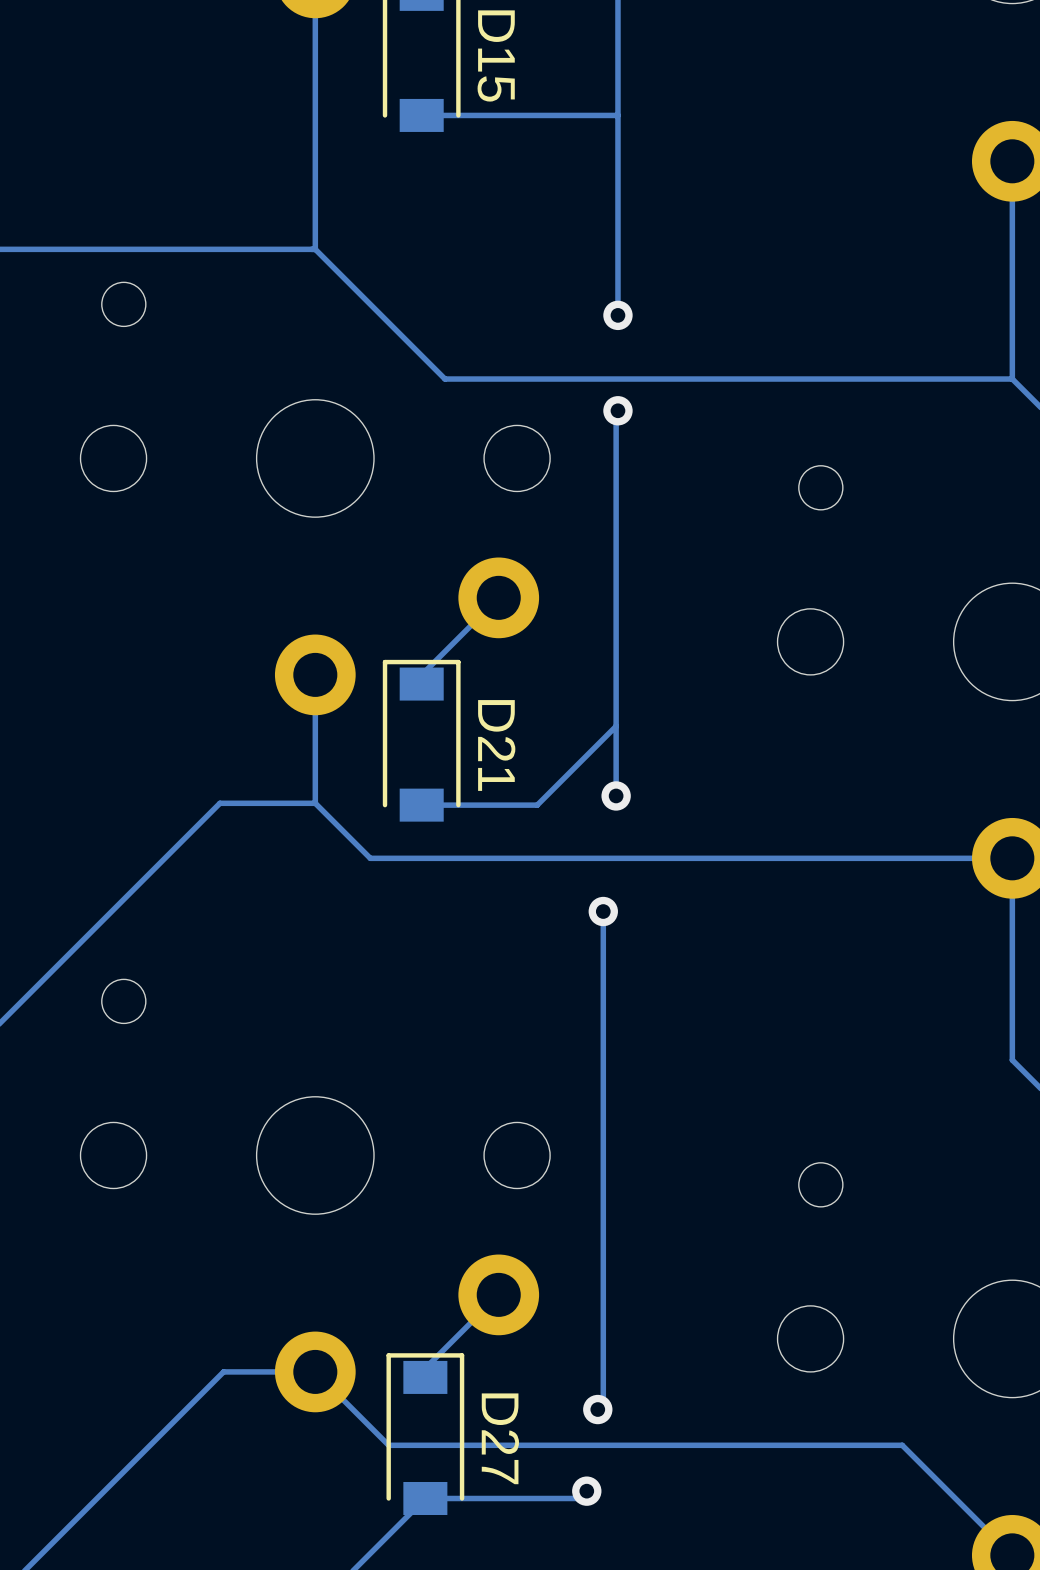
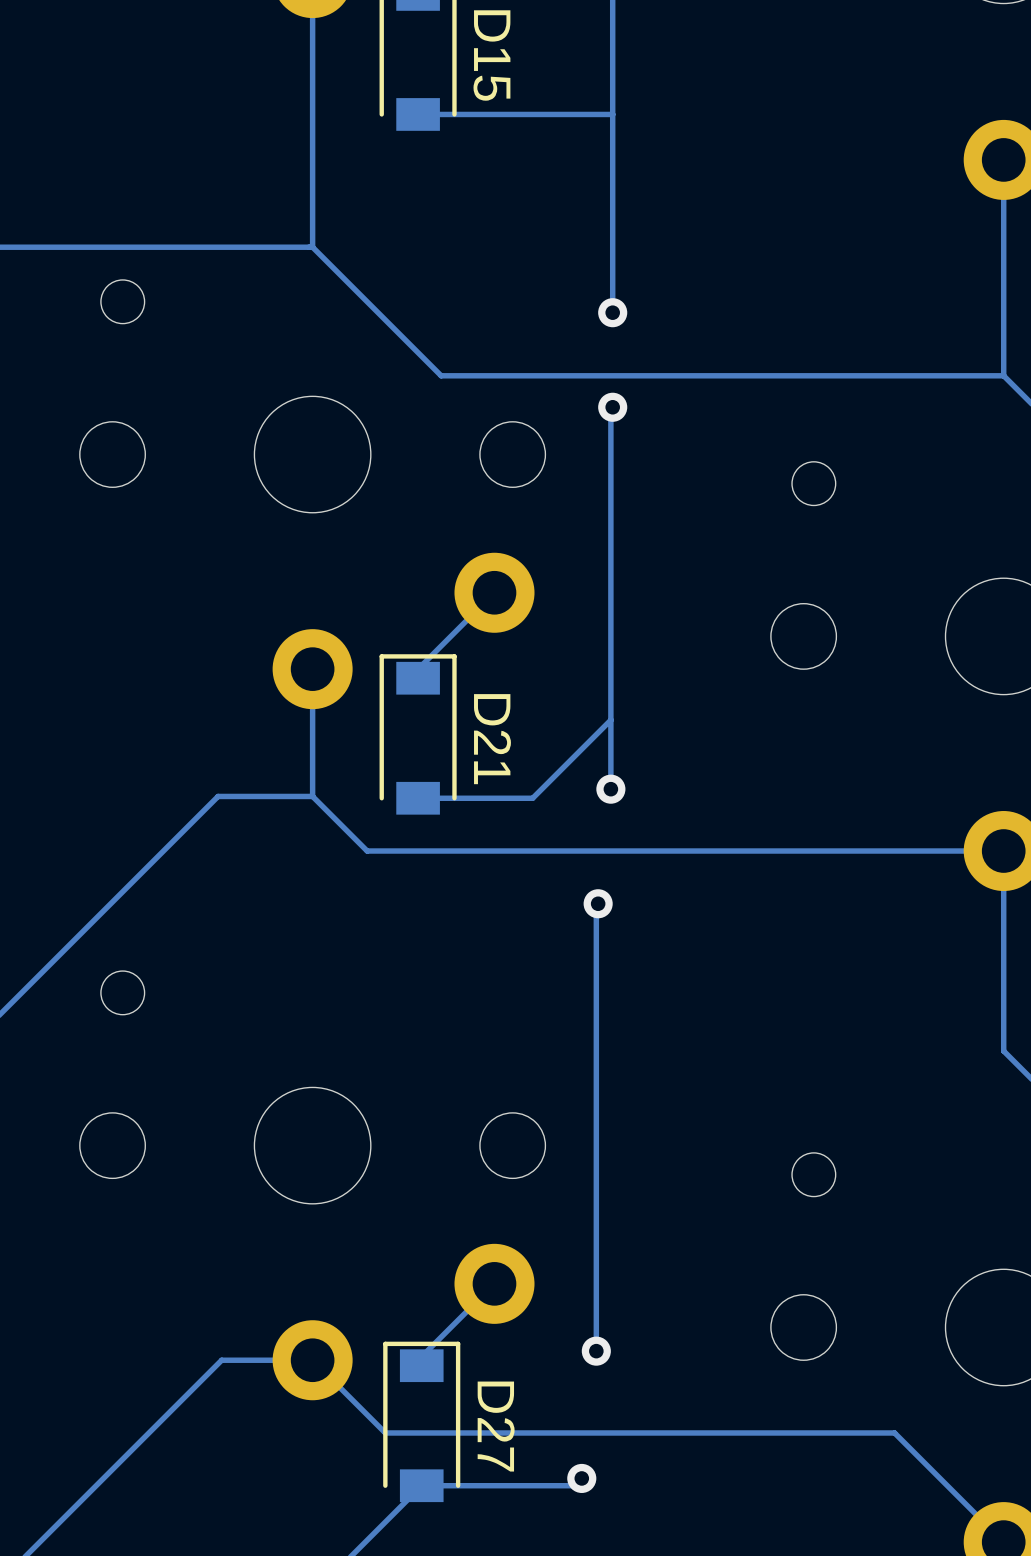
track: (603, 911) (603, 1404) (597, 1409) -> (598, 903) (596, 905) (596, 1351)
via position: (597, 1409) -> (596, 1351)

